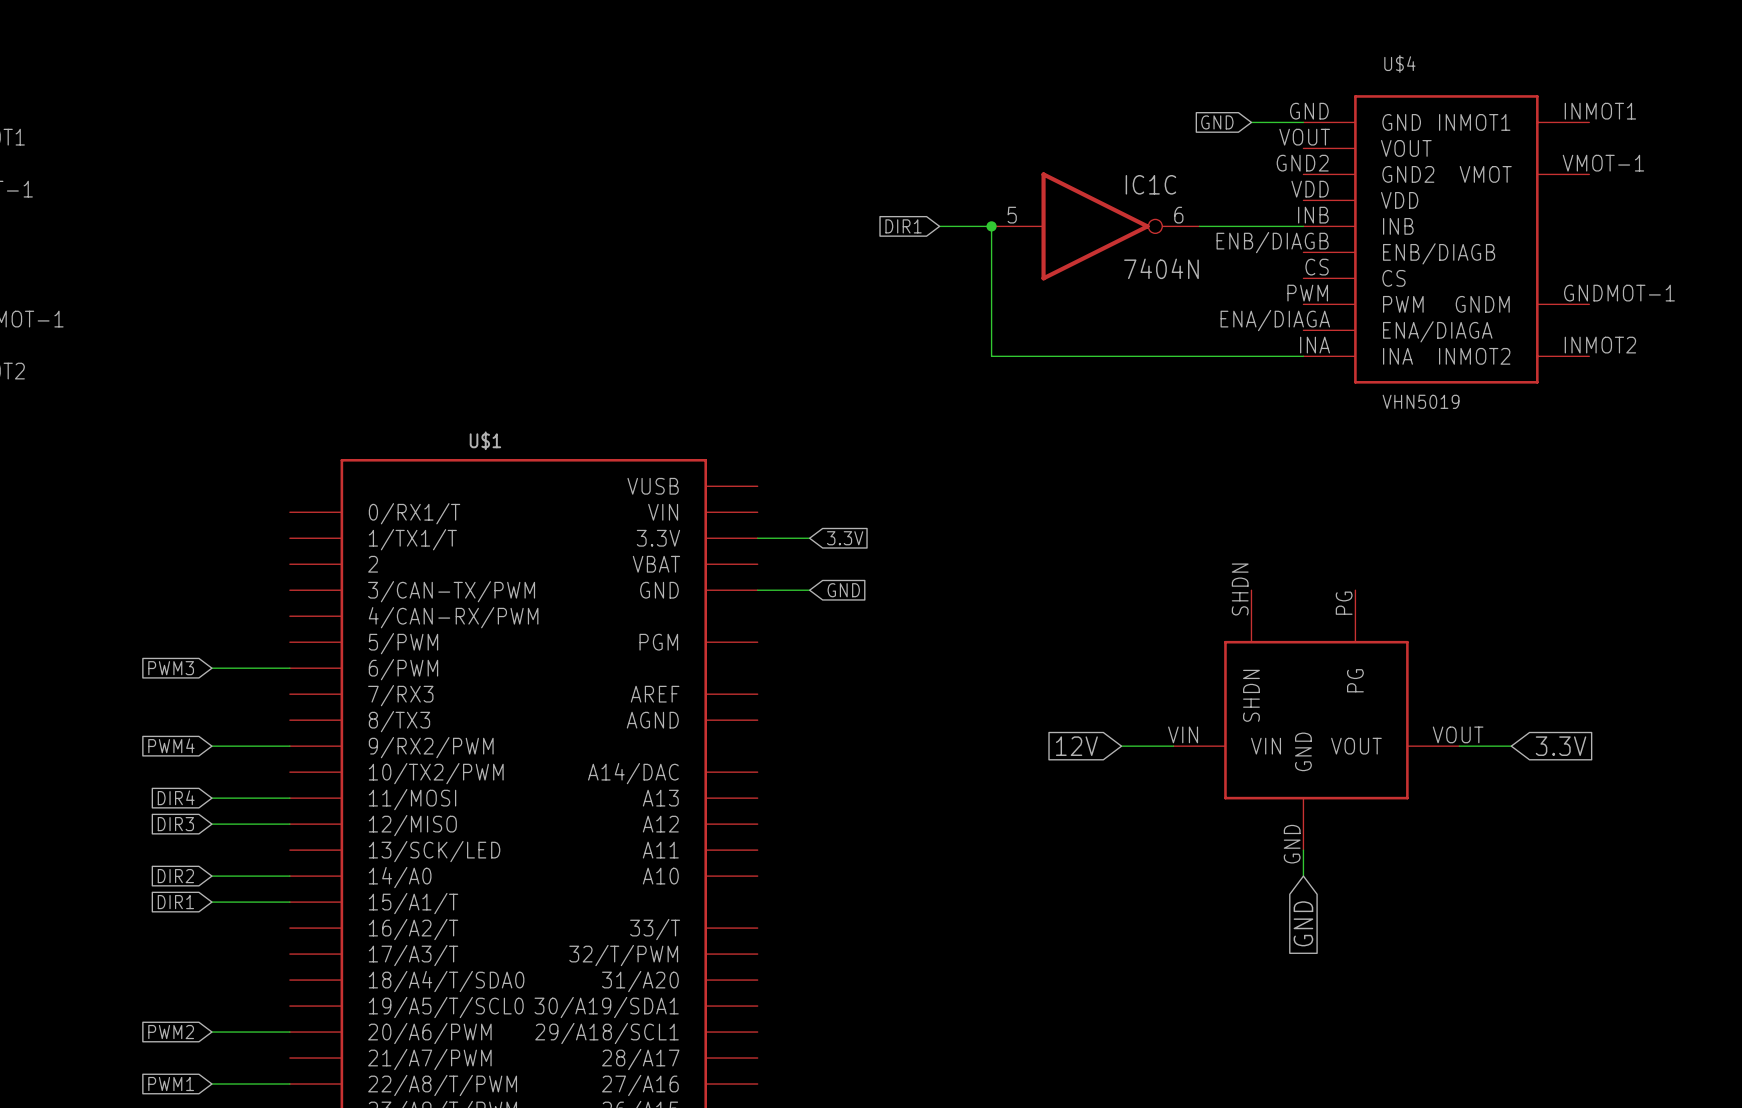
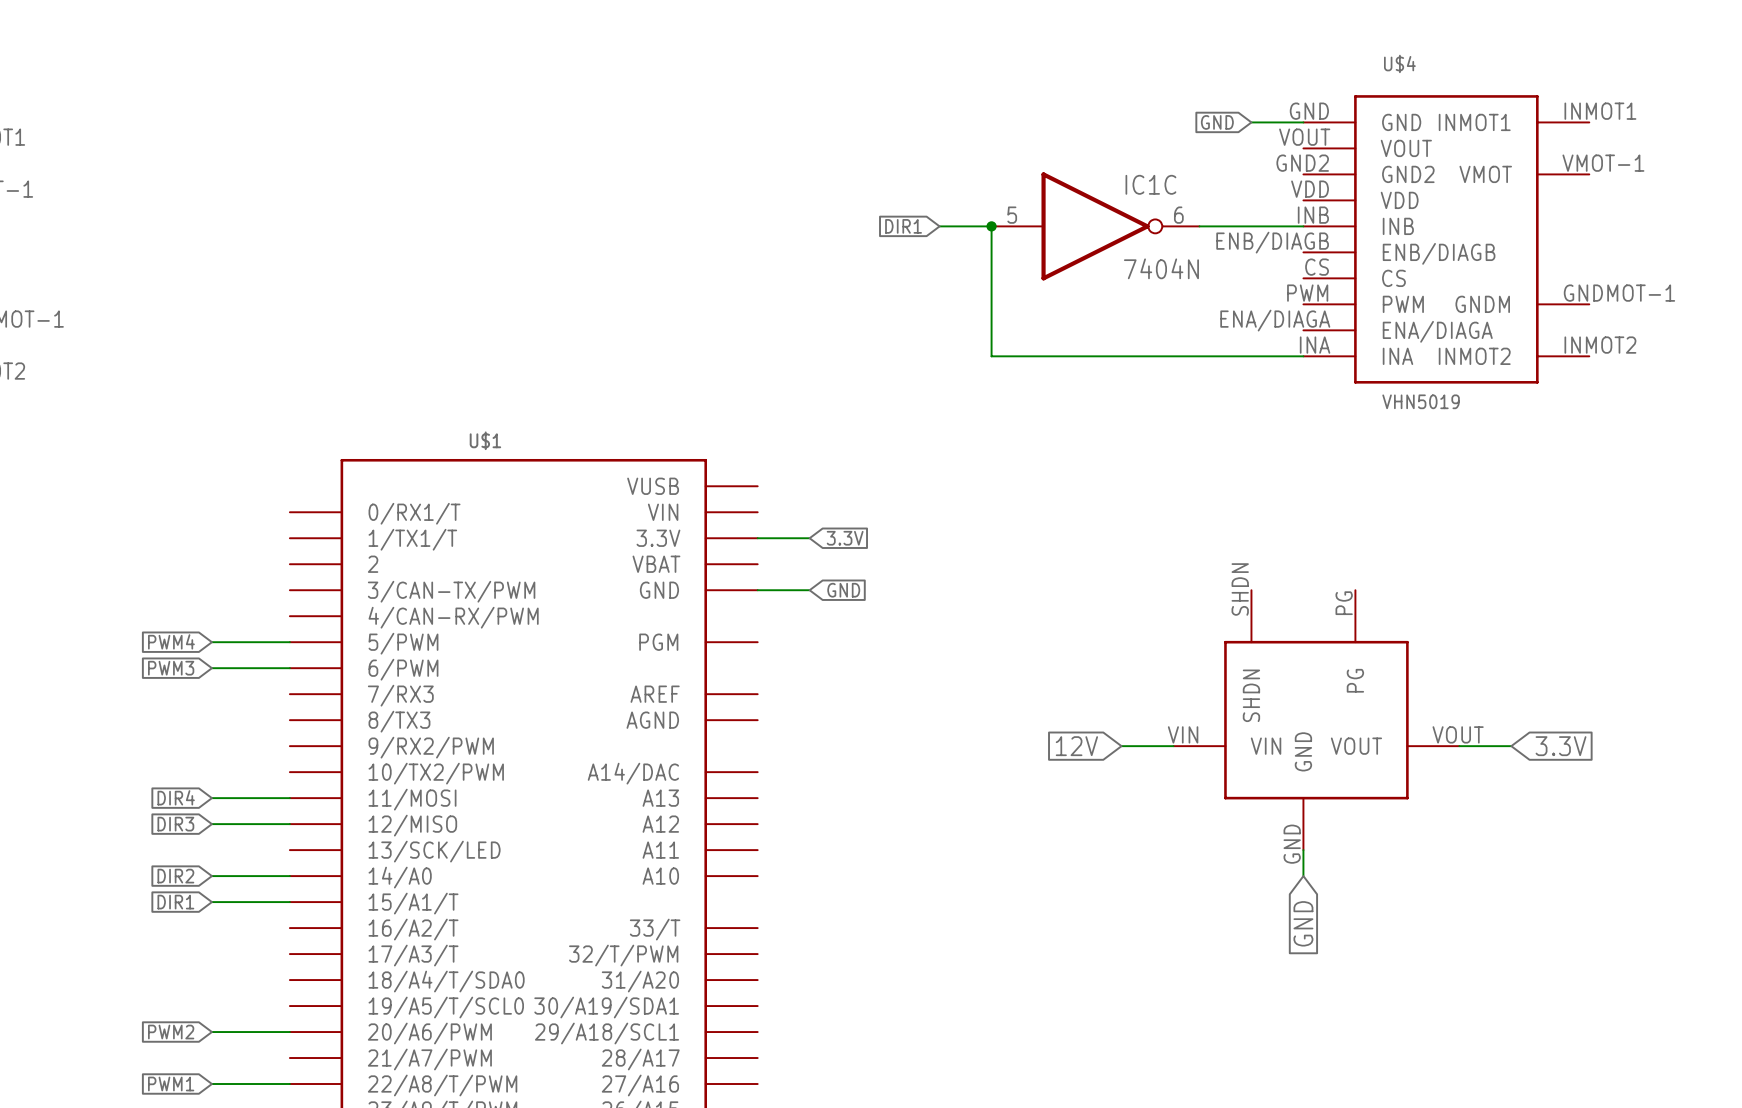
global label position: PWM4 (171, 745) -> PWM4 (171, 641)
wire: (211, 746) (289, 746) -> (211, 642) (289, 642)

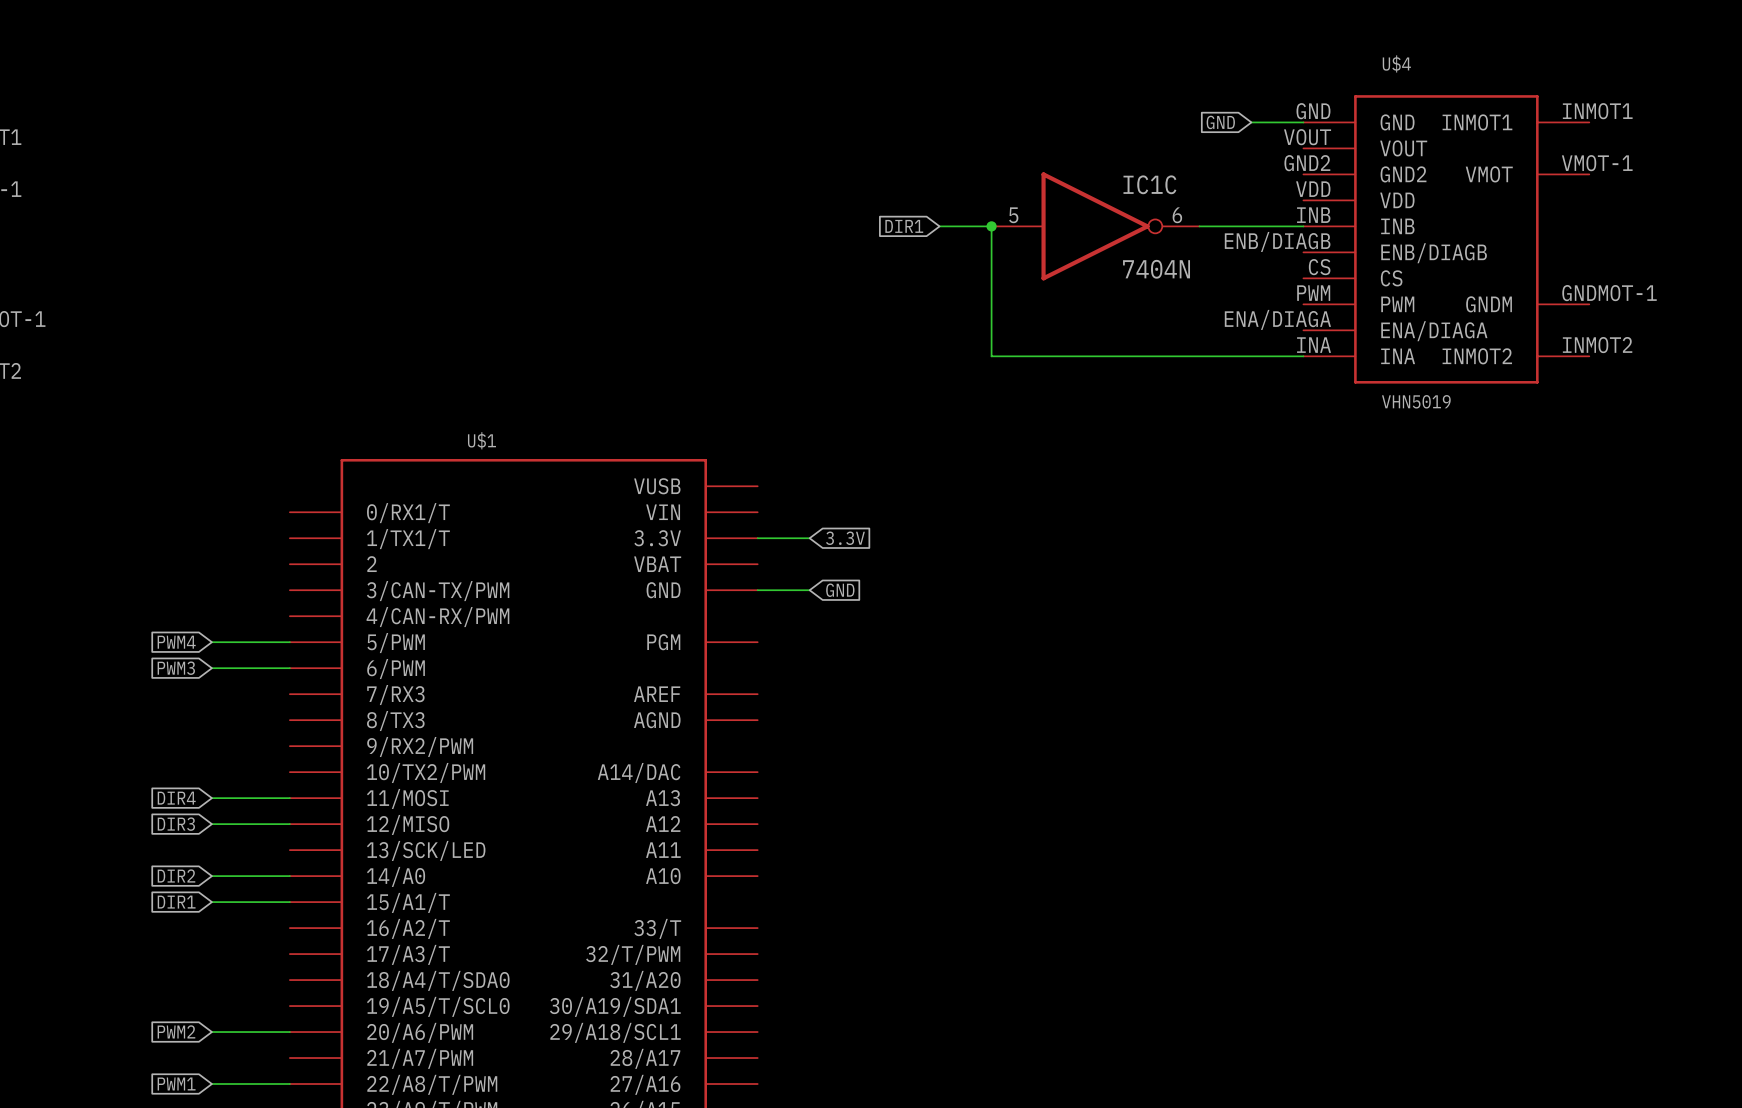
part: (1316, 720) -> none
global label: 12V (1076, 746) -> none
wire: (1121, 746) (1173, 746) -> none
wire: (1459, 746) (1511, 746) -> none
global label: 3.3V (1561, 746) -> none
wire: (1303, 850) (1303, 876) -> none
global label: GND (1303, 923) -> none

